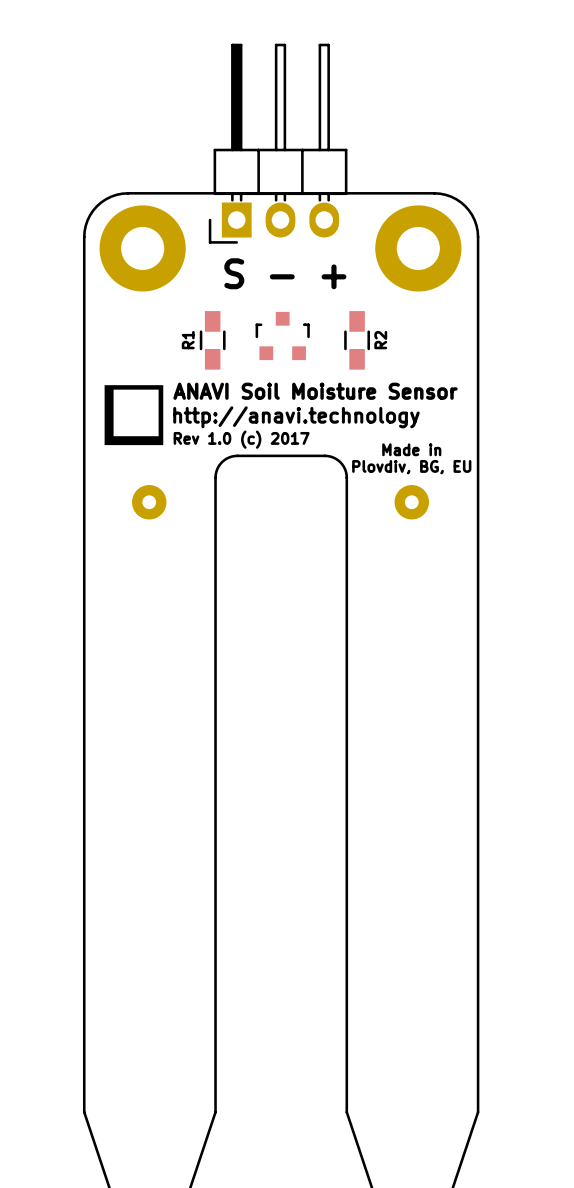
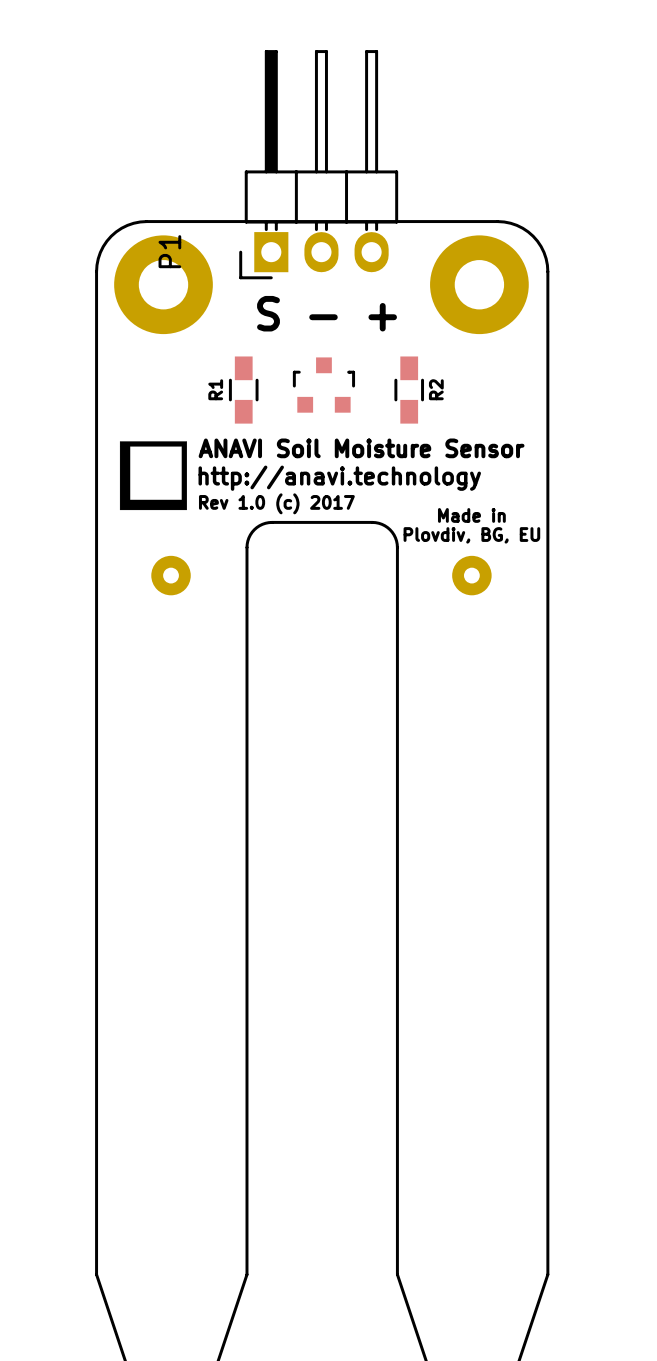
P1 name: none -> P1 (169, 251)

